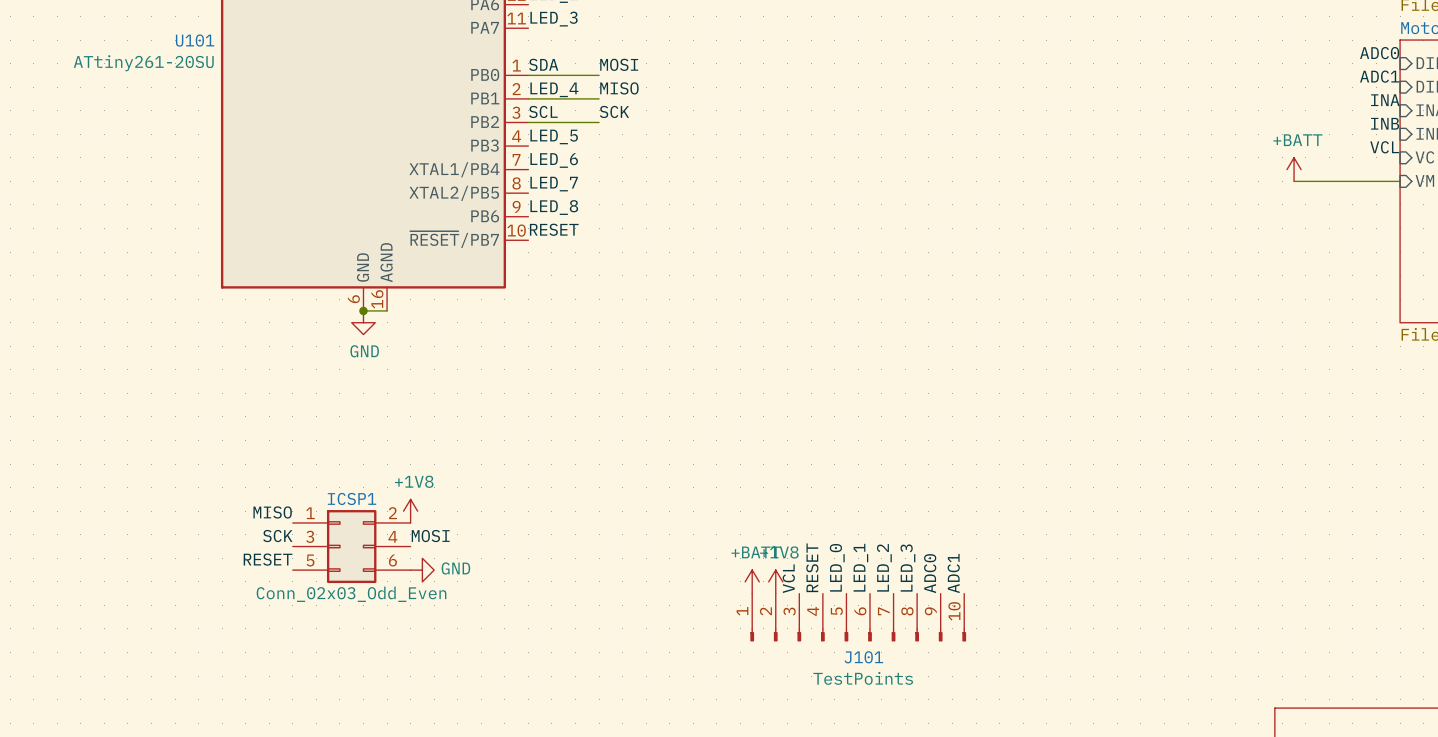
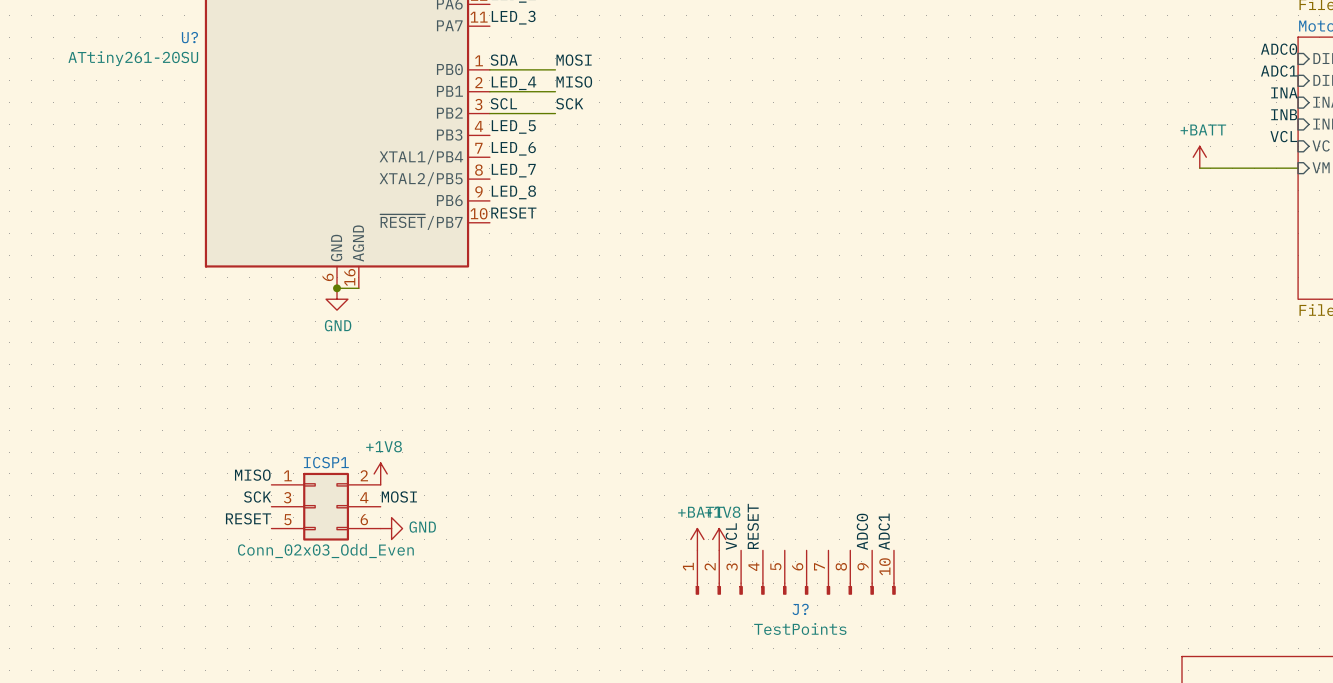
U101 name: U101 (195, 40) -> U? (189, 37)
label: LED_0 (837, 567) -> none
label: LED_1 (860, 567) -> none
label: LED_2 (884, 567) -> none
label: LED_3 (907, 568) -> none
J101 name: J101 (863, 657) -> J? (800, 609)

